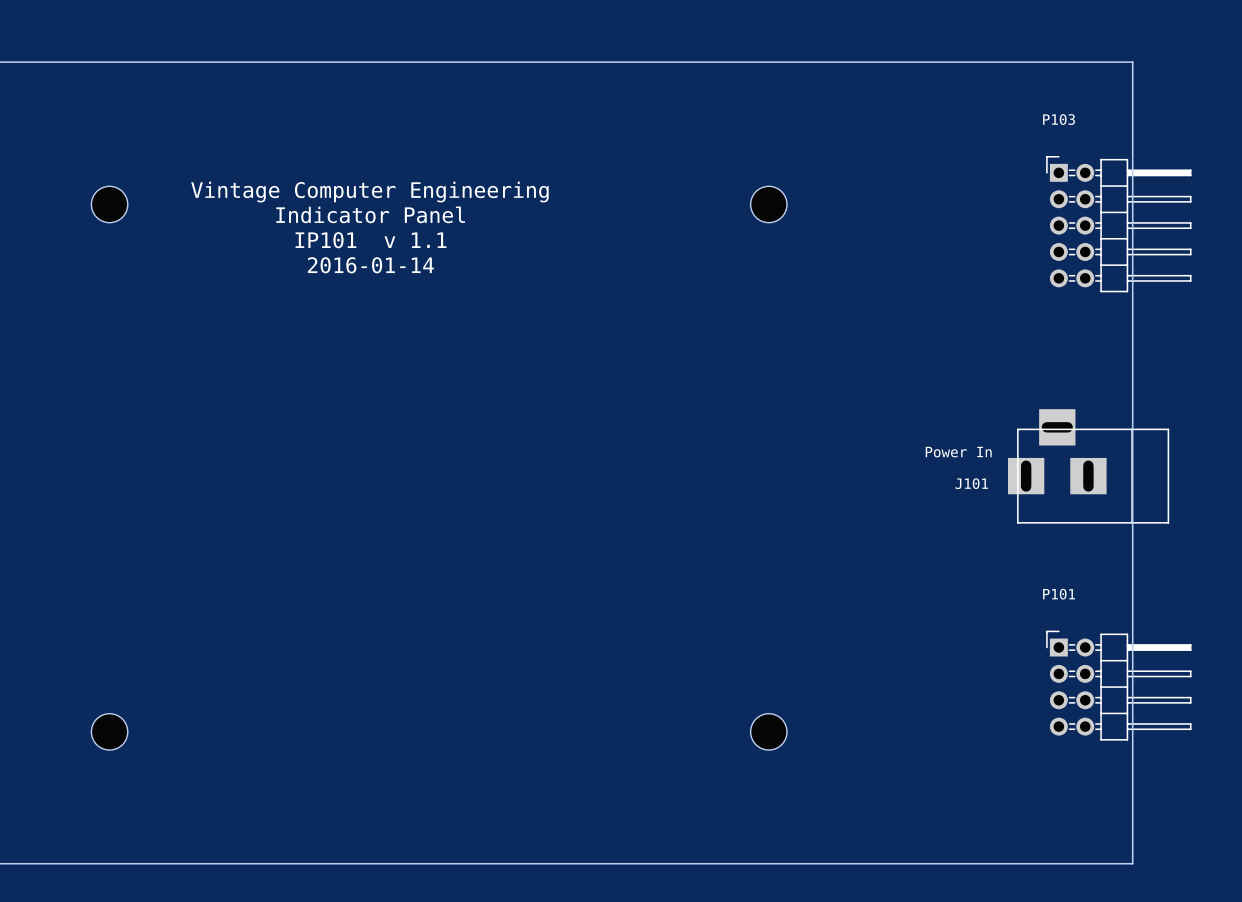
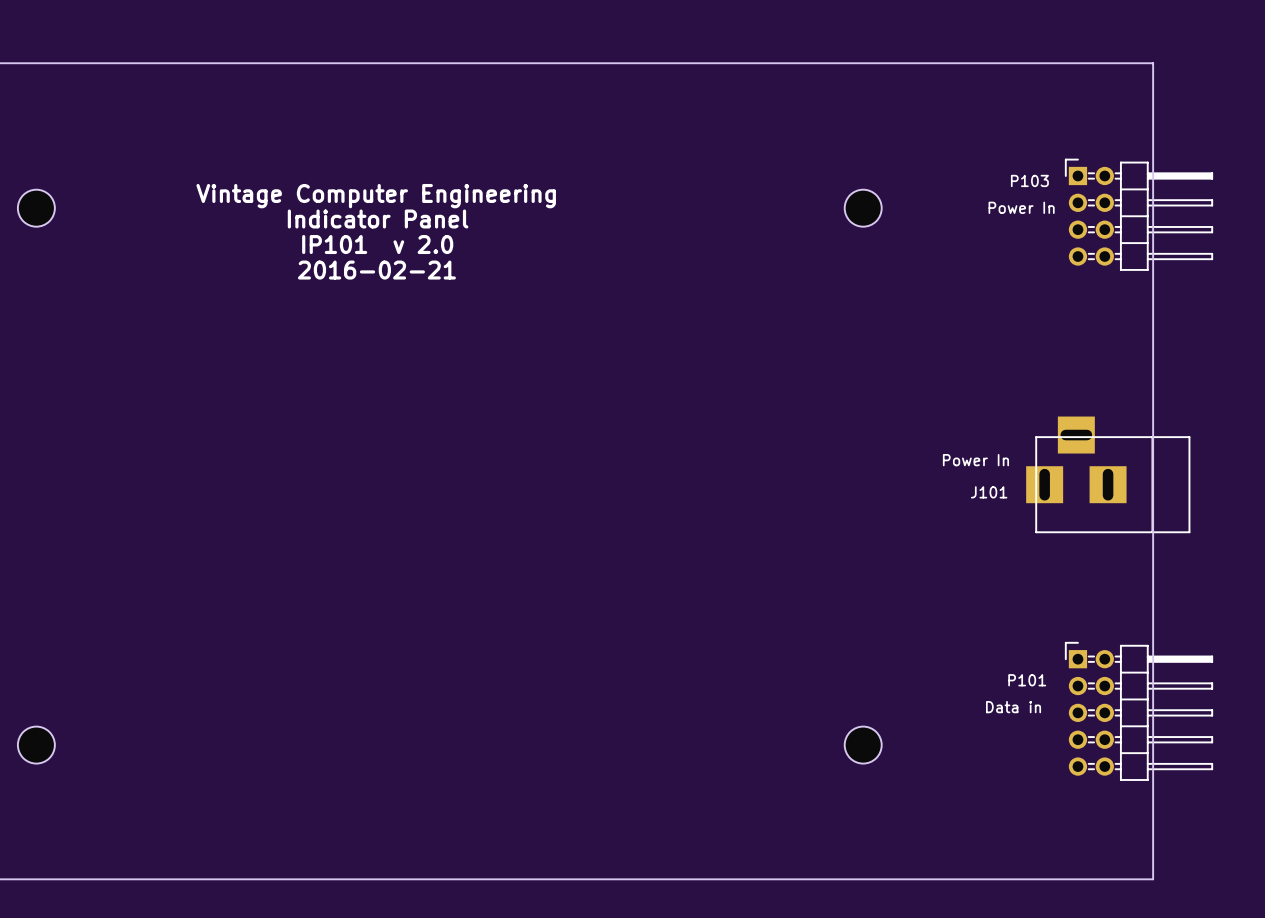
P103 name position: P103 (1059, 119) -> P103 (1029, 180)
P103 footprint: [1046, 155, 1192, 293] -> [1065, 158, 1213, 271]
part position: (109, 204) -> (36, 208)
part position: (768, 204) -> (863, 208)
P103 value: none -> Power In (1021, 207)
text: IP101 v 1.1 (370, 240) -> IP101 v 2.0 (377, 244)
text: 2016-01-14 (370, 265) -> 2016-02-21 (376, 270)
P101 name position: P101 (1059, 594) -> P101 (1027, 680)
P101 footprint: [1046, 630, 1192, 741] -> [1065, 642, 1213, 781]
P101 value: none -> Data in (1013, 707)
part position: (109, 731) -> (36, 745)
part position: (768, 731) -> (863, 745)

